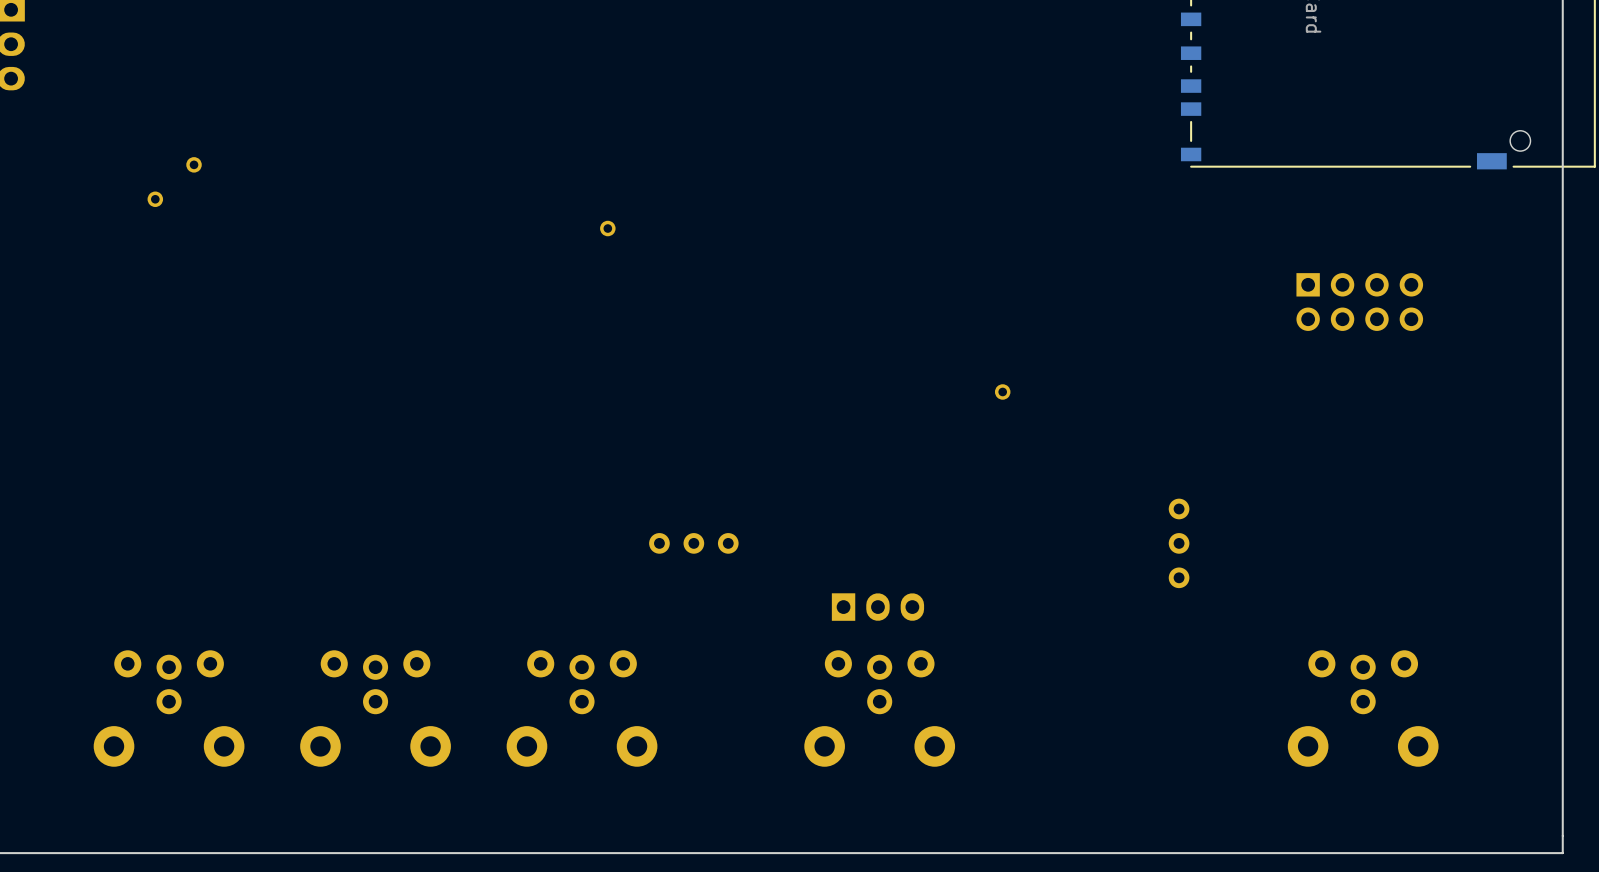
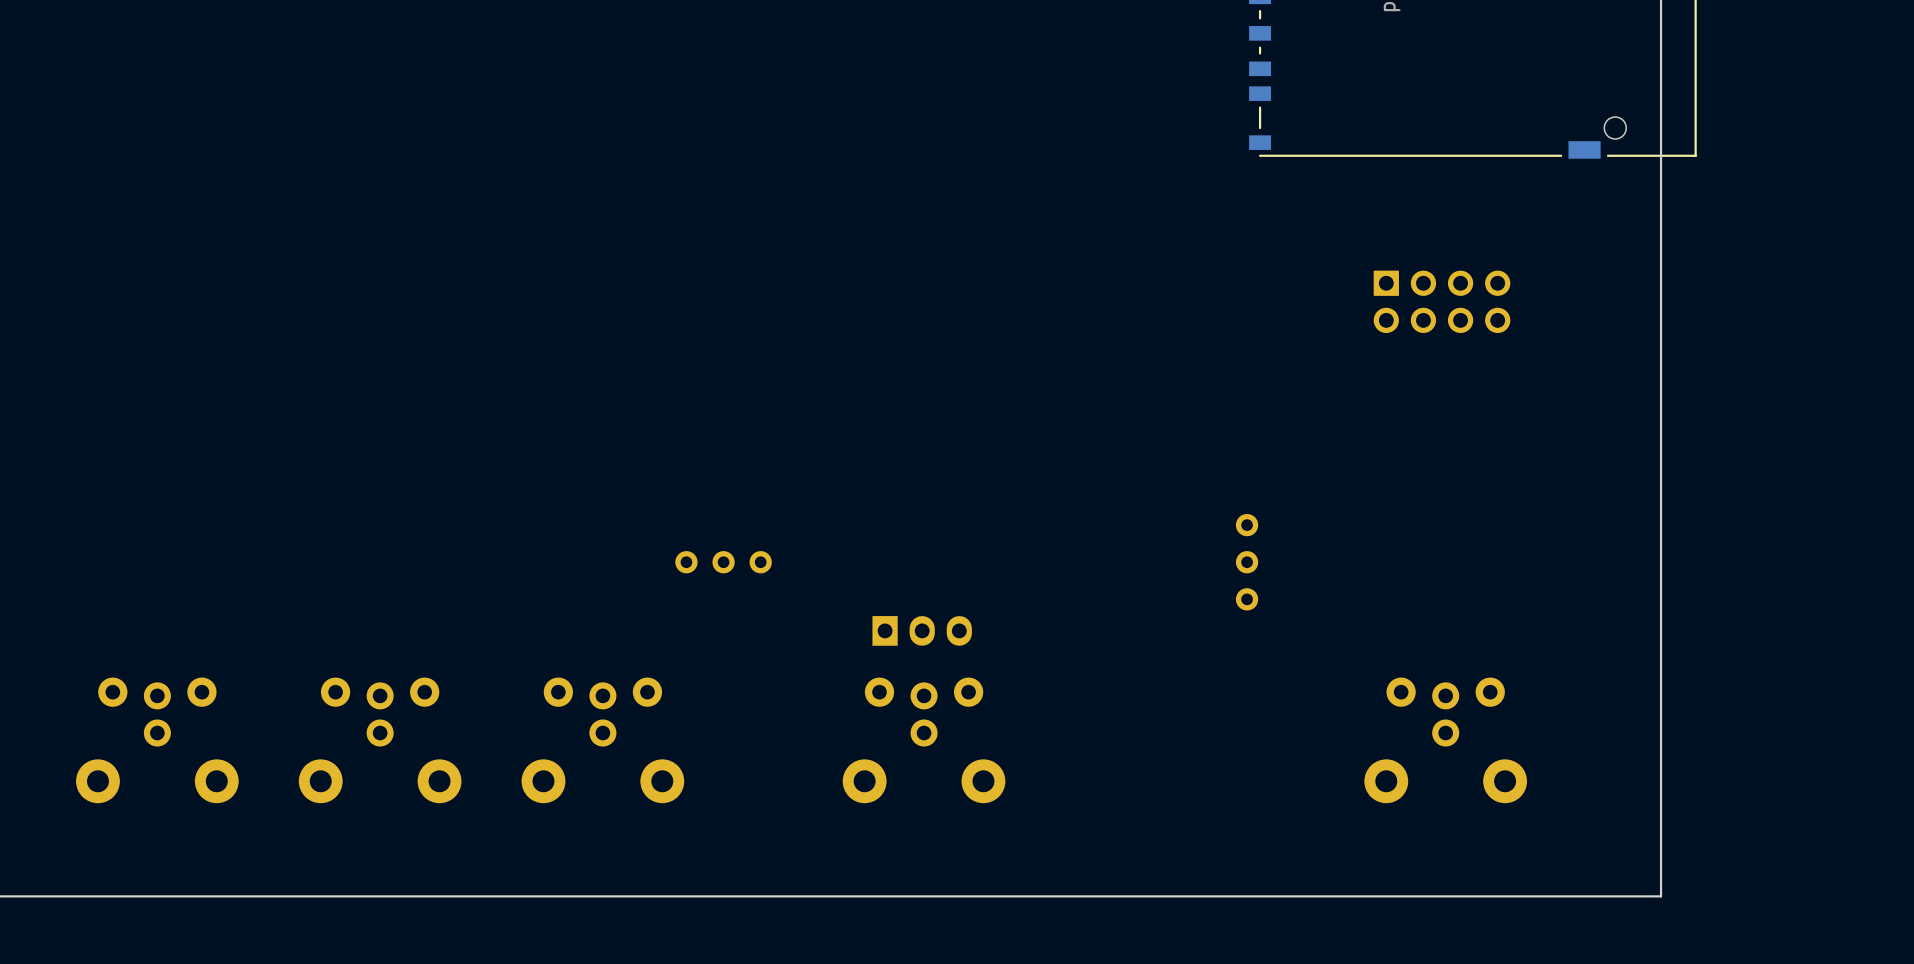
part: (194, 164) -> none
part: (155, 199) -> none
part: (607, 228) -> none
part: (1002, 391) -> none

